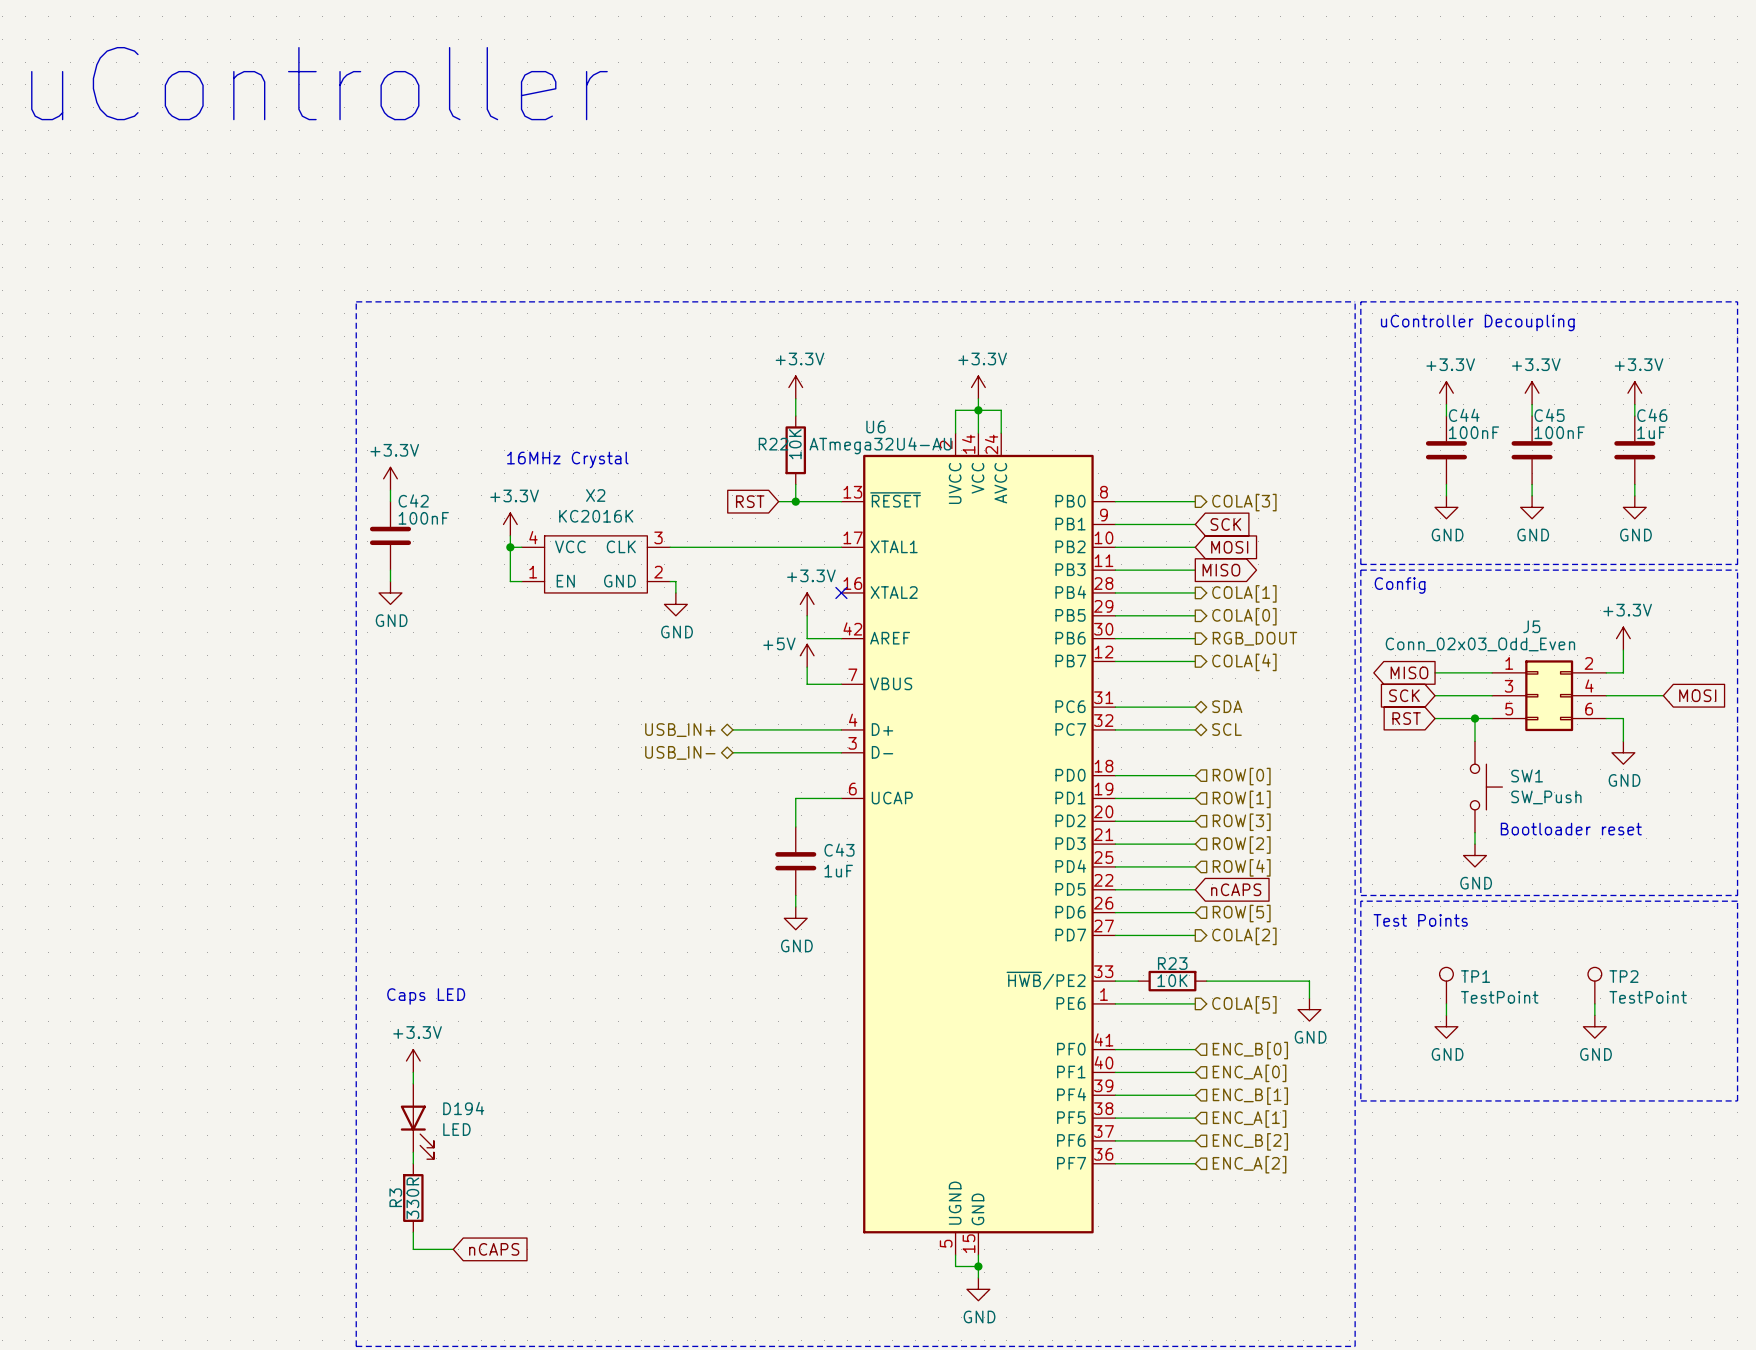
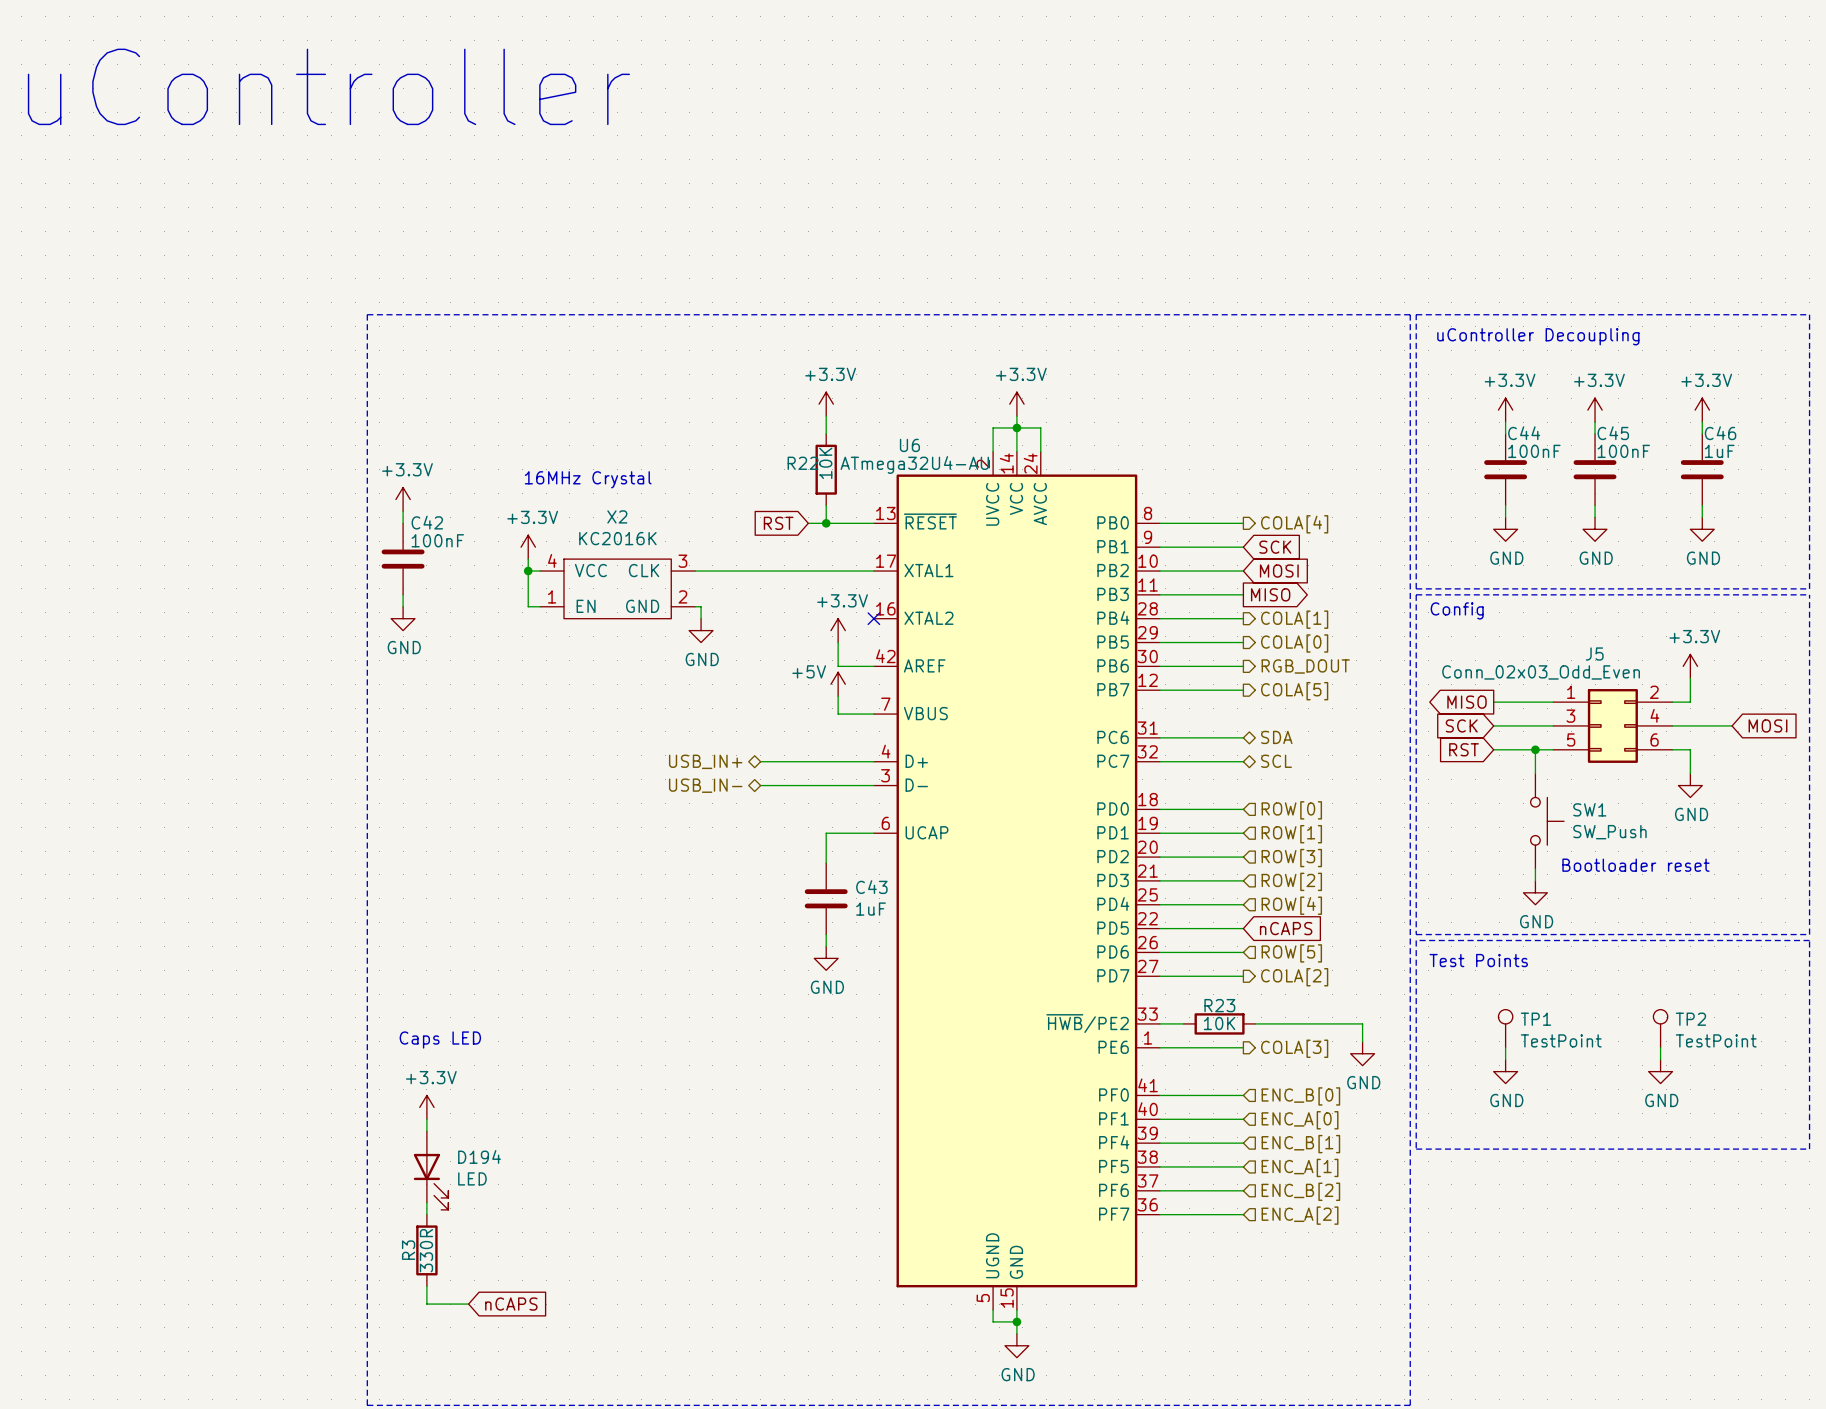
hierarchical label: COLA[3] (1244, 502) -> COLA[4] (1294, 524)
hierarchical label: COLA[4] (1244, 662) -> COLA[5] (1294, 691)
hierarchical label: COLA[5] (1244, 1004) -> COLA[3] (1294, 1048)

